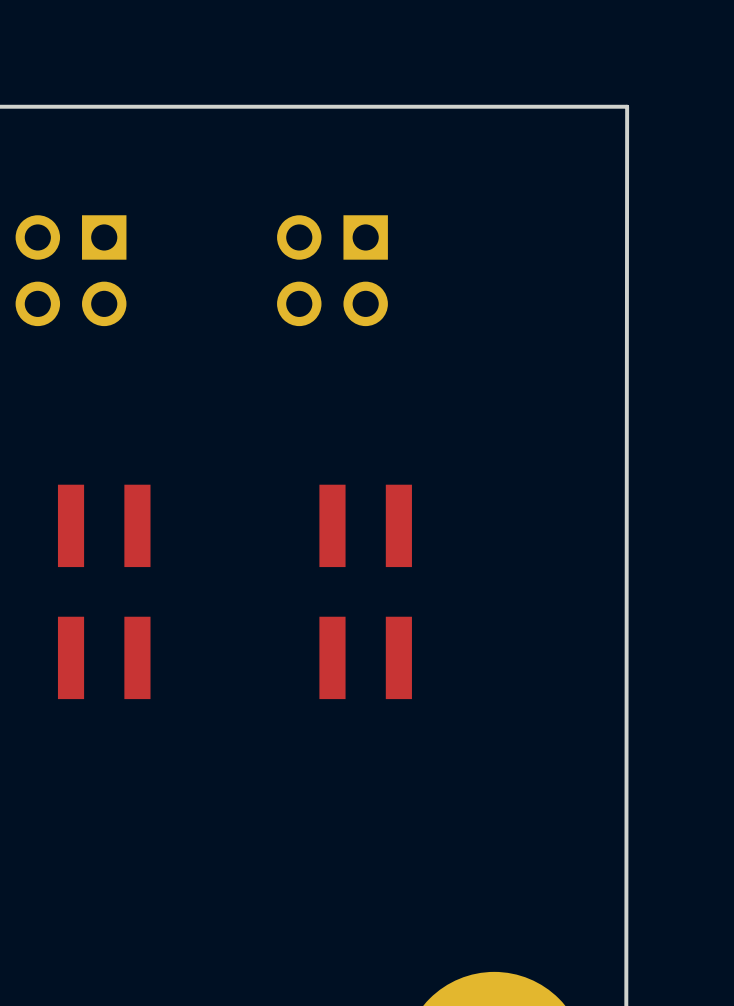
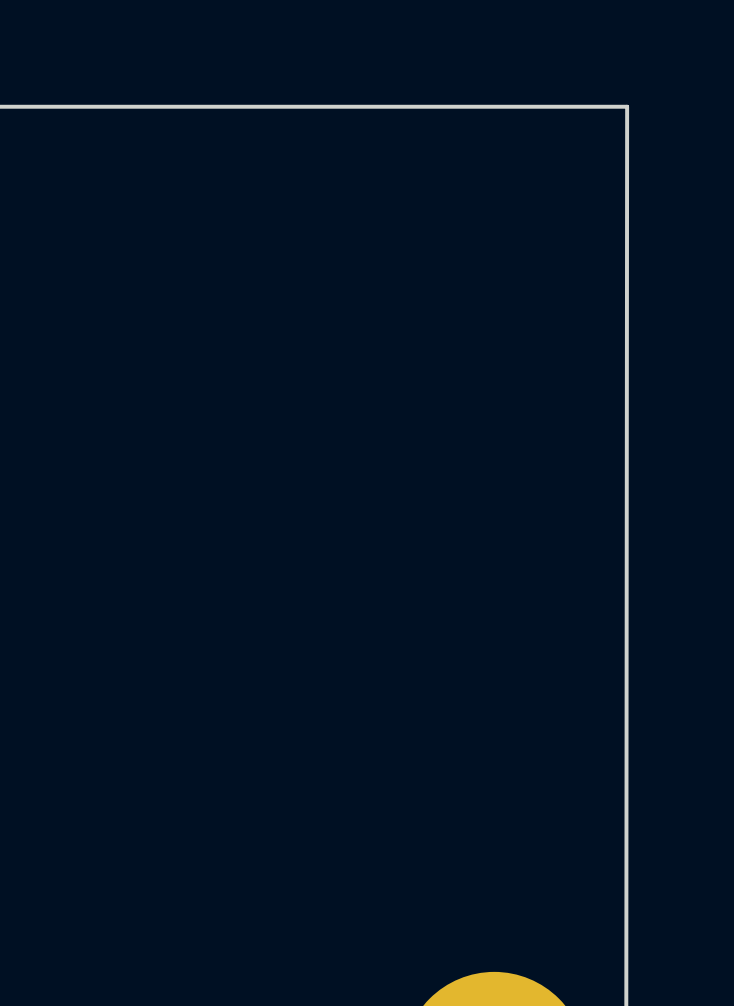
part: (71, 270) -> none
part: (332, 270) -> none
part: (104, 591) -> none
part: (365, 591) -> none

